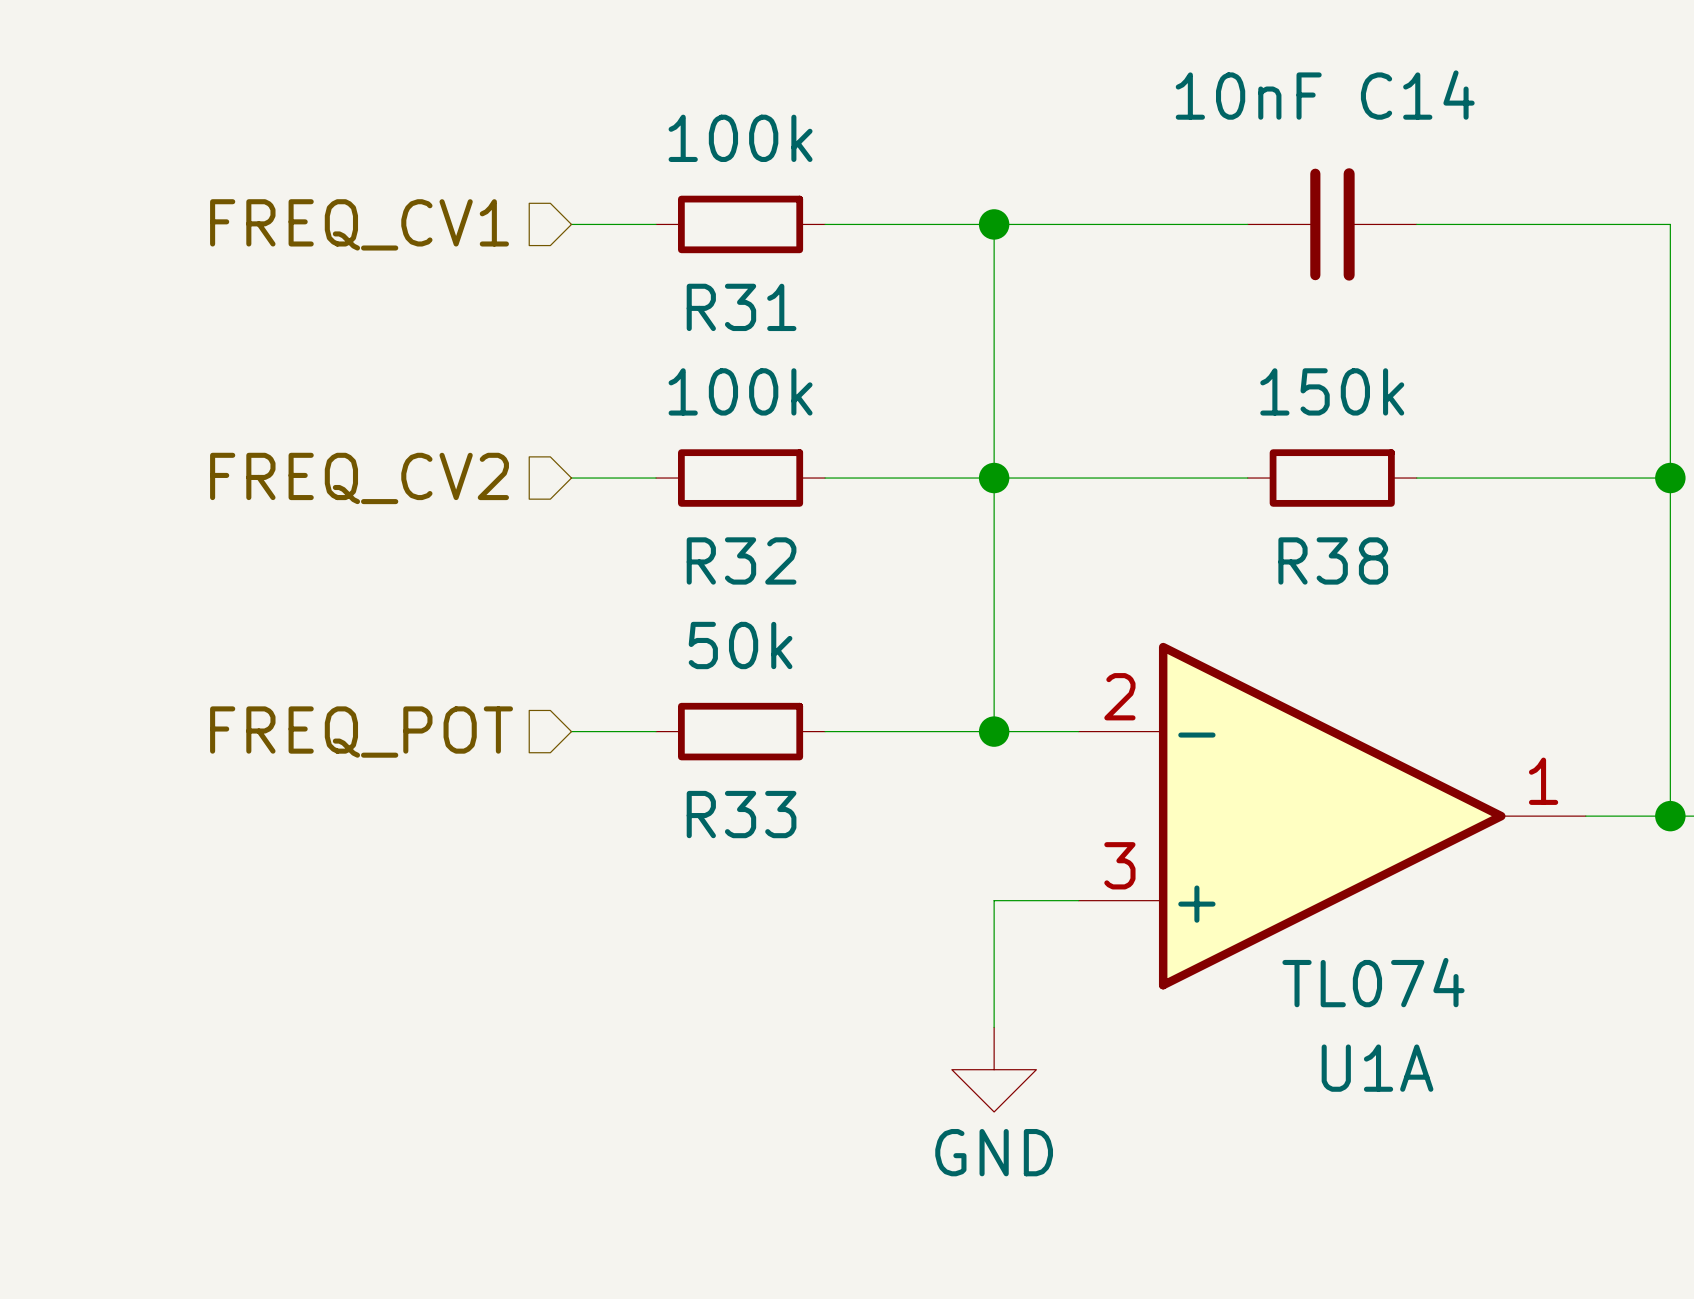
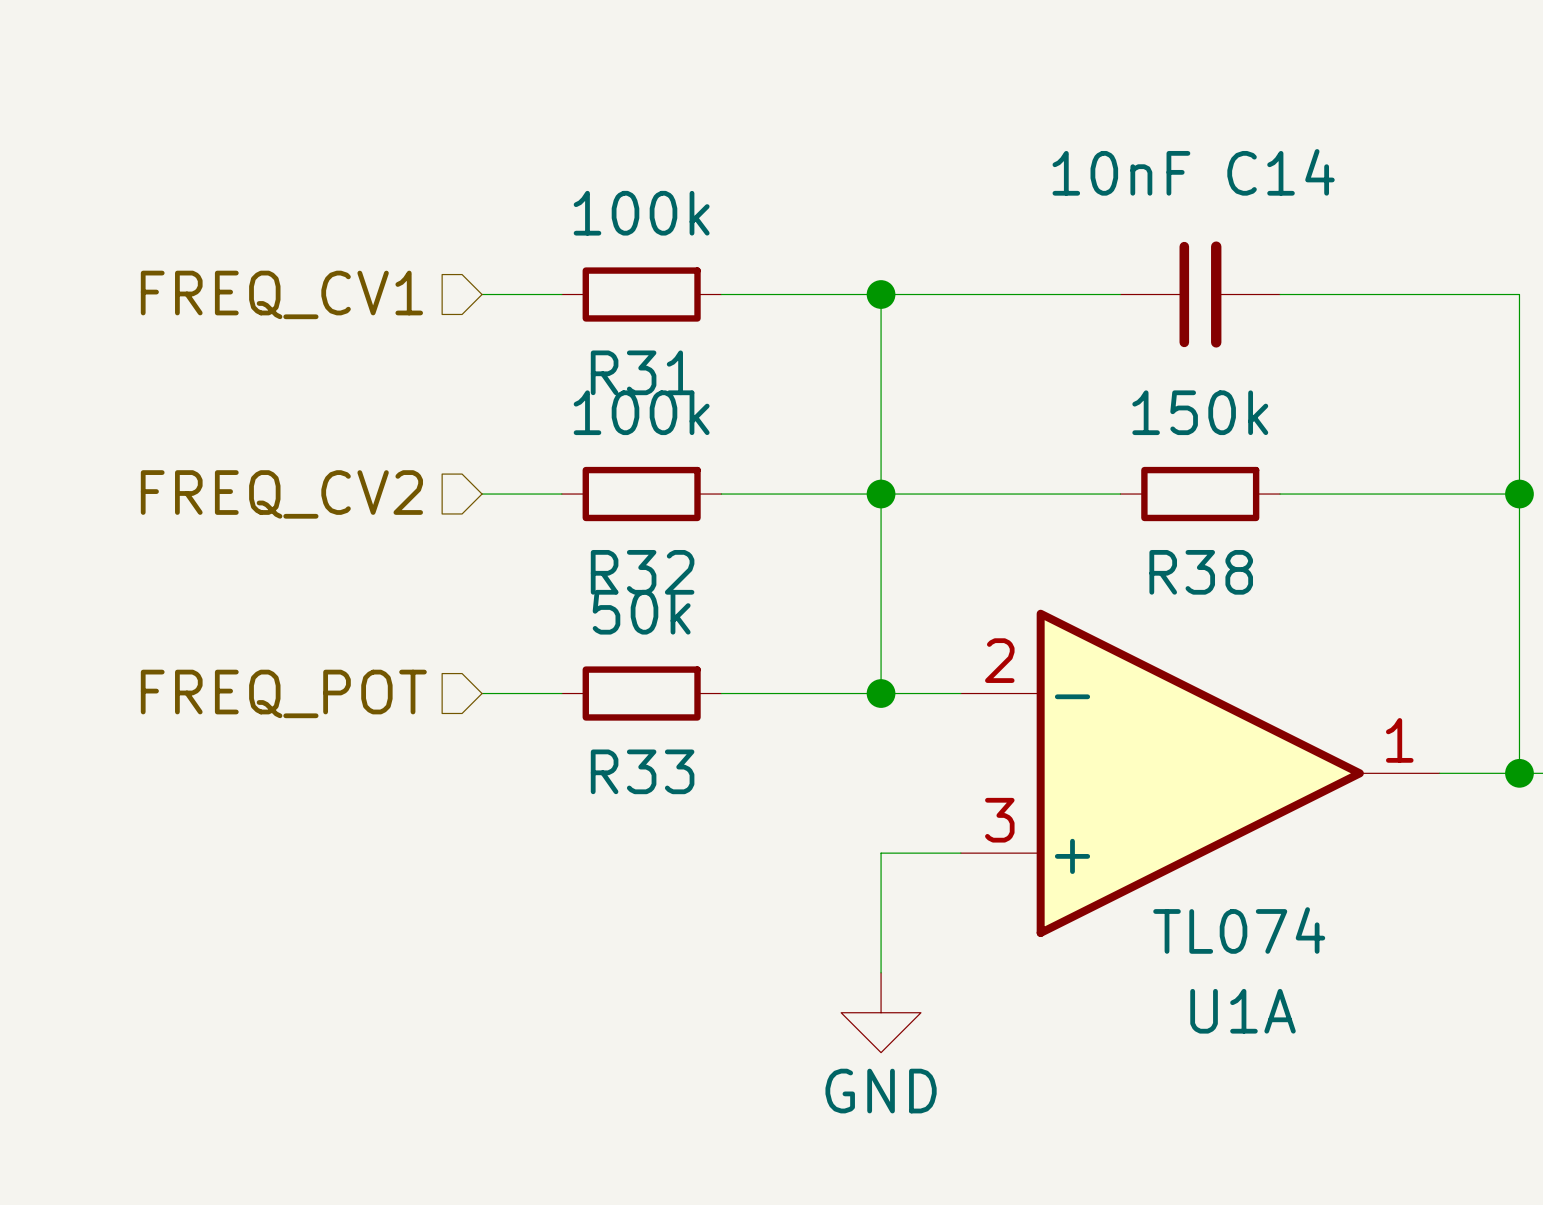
hierarchical label position: FREQ_CV1 (359, 224) -> FREQ_CV1 (281, 294)
wire: (571, 224) (656, 224) -> (482, 294) (561, 294)
R31 position: (740, 224) -> (641, 294)
wire: (825, 224) (1247, 224) -> (721, 294) (1120, 294)
wire: (994, 224) (994, 308) -> none
junction: (994, 224) -> none
C14 position: (1332, 224) -> (1200, 294)
wire: (1416, 224) (1670, 224) (1670, 308) -> (1280, 294) (1519, 294)
junction: none -> (881, 294)
hierarchical label position: FREQ_CV2 (359, 478) -> FREQ_CV2 (281, 494)
wire: (571, 478) (656, 478) -> (482, 494) (561, 494)
R32 position: (740, 478) -> (641, 494)
wire: (825, 478) (1247, 478) -> (721, 494) (1120, 494)
junction position: (994, 478) -> (881, 494)
R38 position: (1332, 478) -> (1200, 494)
wire: (1416, 478) (1670, 478) -> (1280, 494) (1519, 494)
junction position: (1670, 478) -> (1519, 494)

